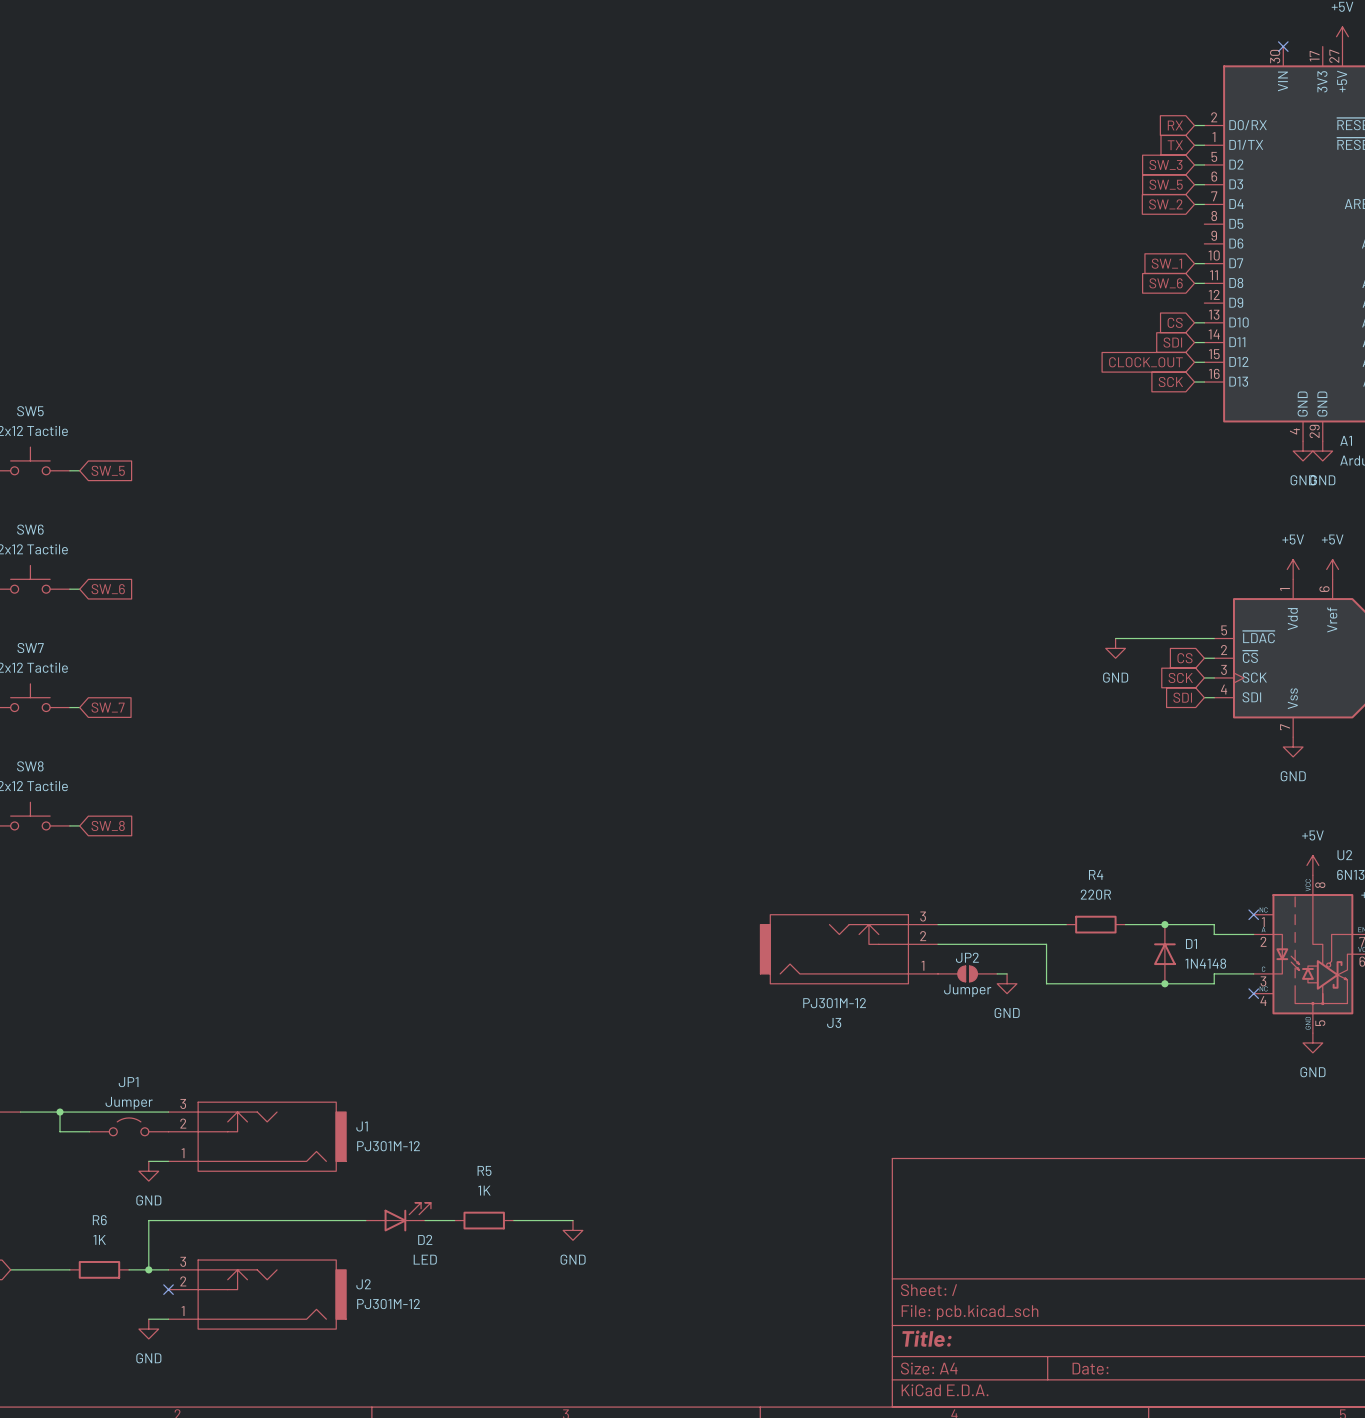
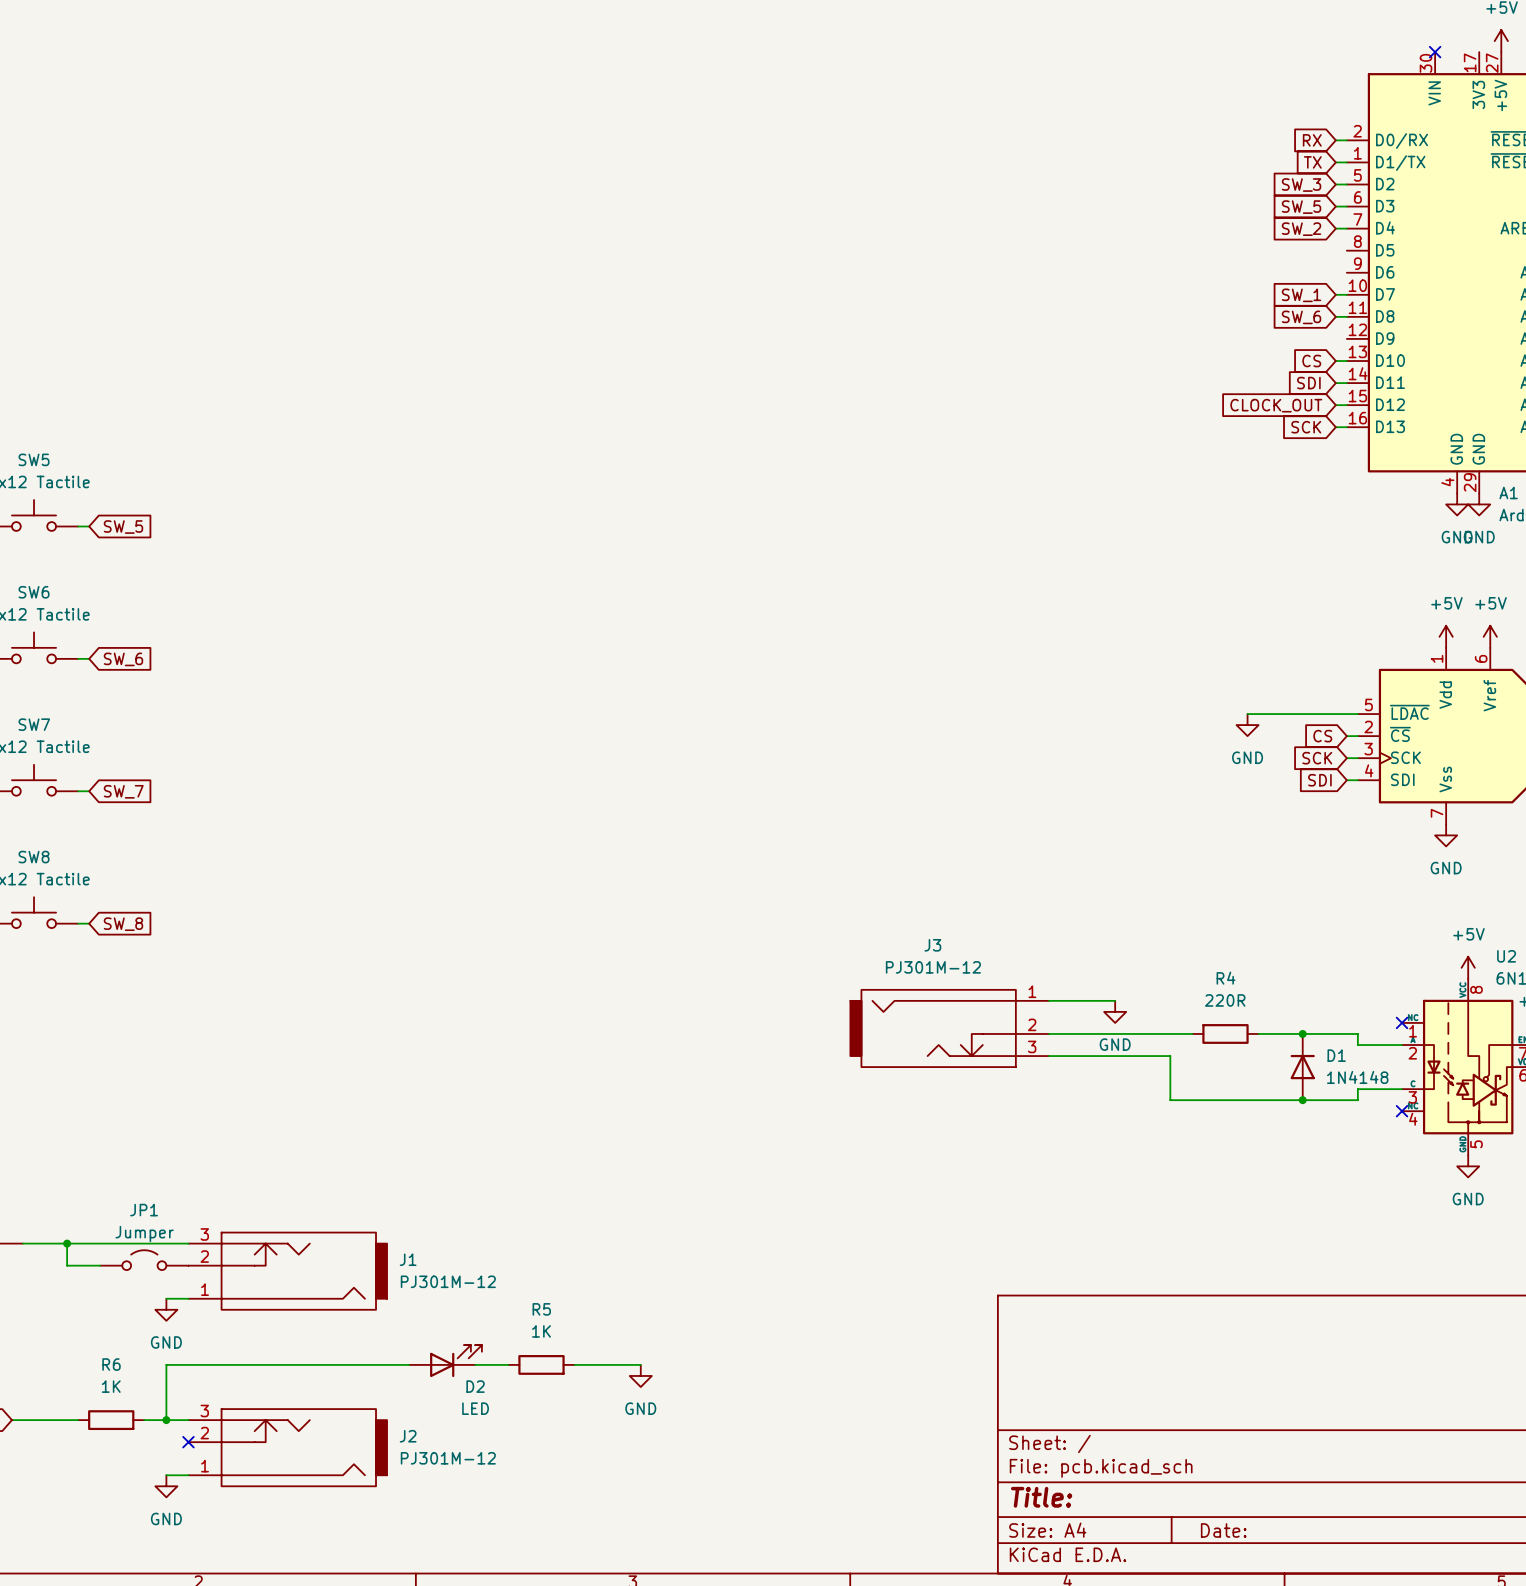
wire: none -> (1048, 1000) (1115, 1000)
J3 flip: as is (834, 949) -> up-down (933, 1028)
JP2: Jumper (967, 973) -> none
wire: (997, 973) (1007, 973) -> none
power symbol position: GND (1007, 983) -> GND (1115, 1011)

